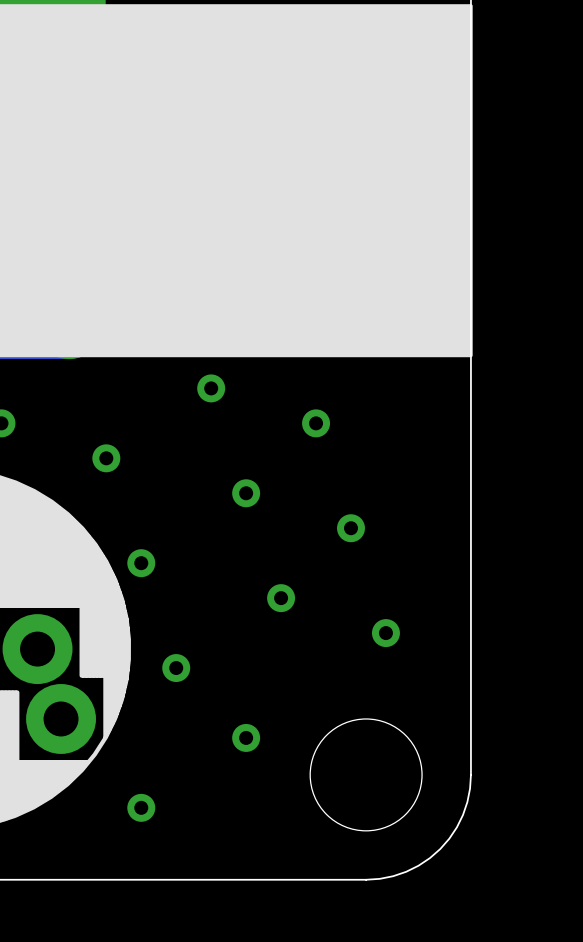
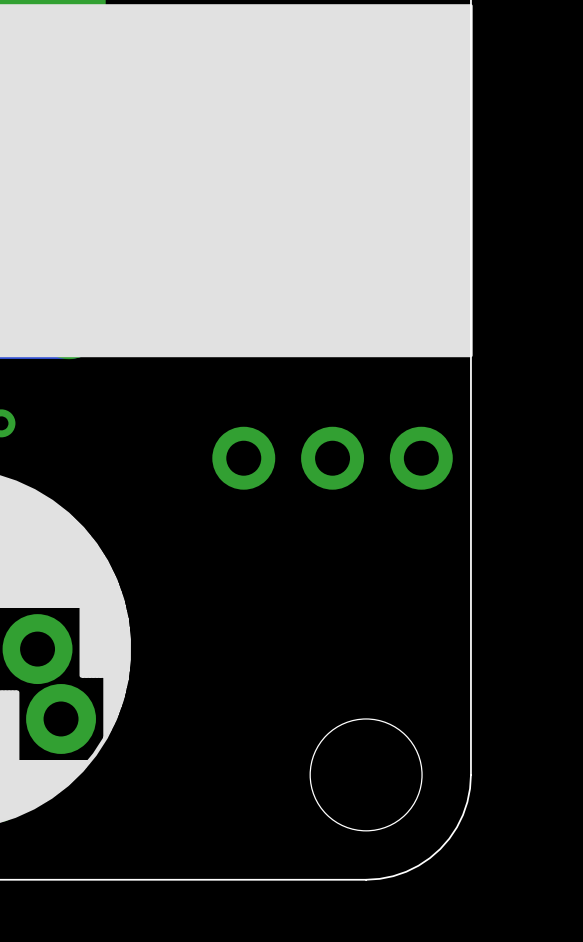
via: (211, 388) -> none
via: (316, 423) -> none
via: (106, 458) -> none
via: none -> (243, 458)
via: none -> (332, 458)
via: none -> (421, 458)
via: (246, 493) -> none
via: (351, 528) -> none
via: (141, 563) -> none
via: (281, 598) -> none
via: (385, 633) -> none
via: (176, 668) -> none
via: (246, 737) -> none
via: (141, 807) -> none

